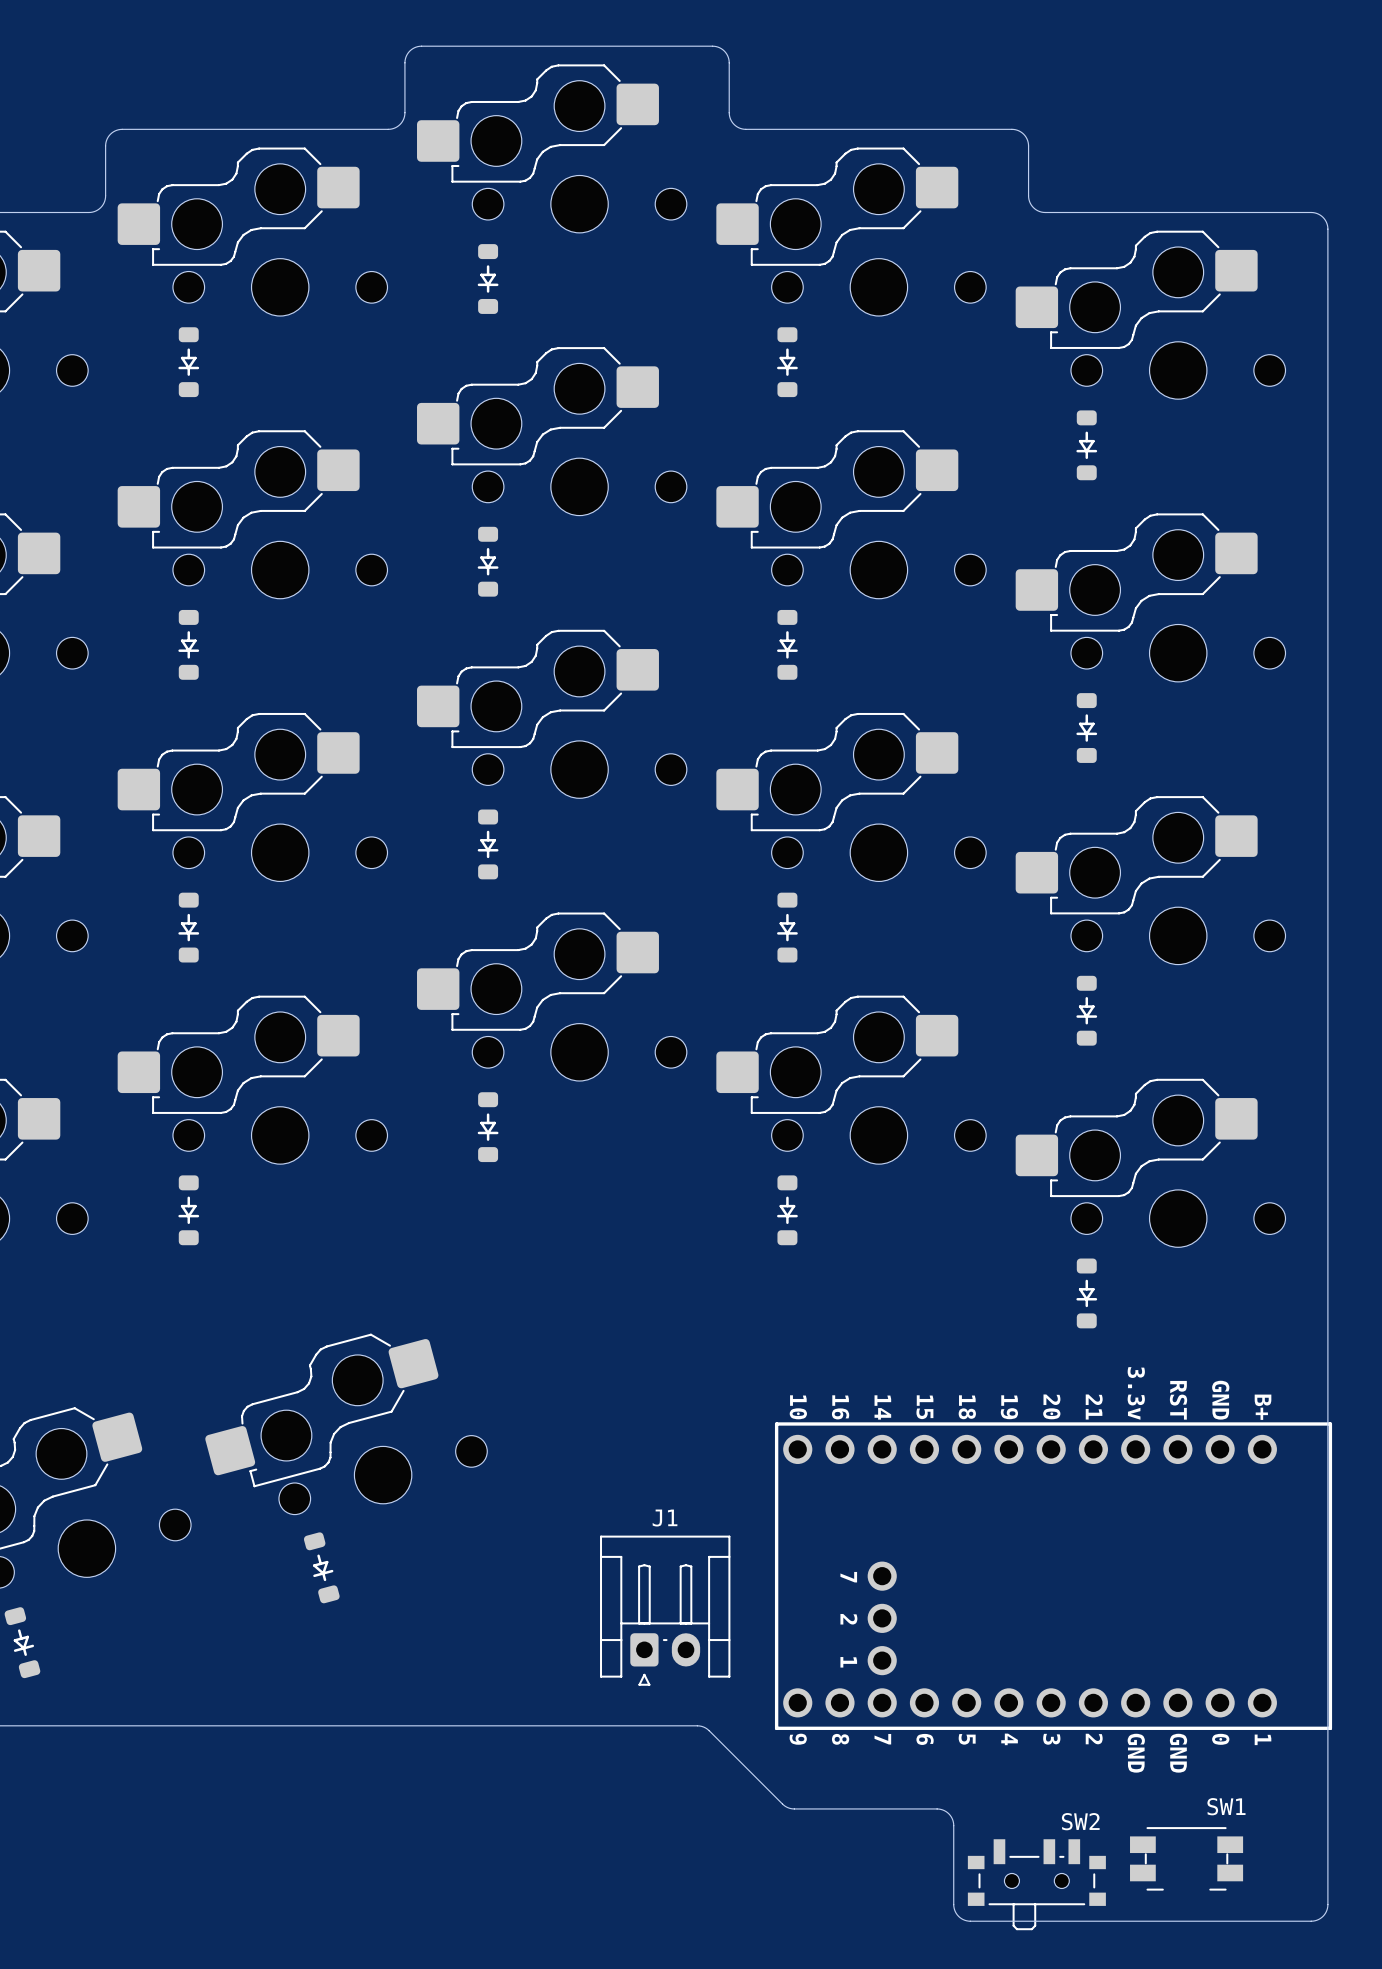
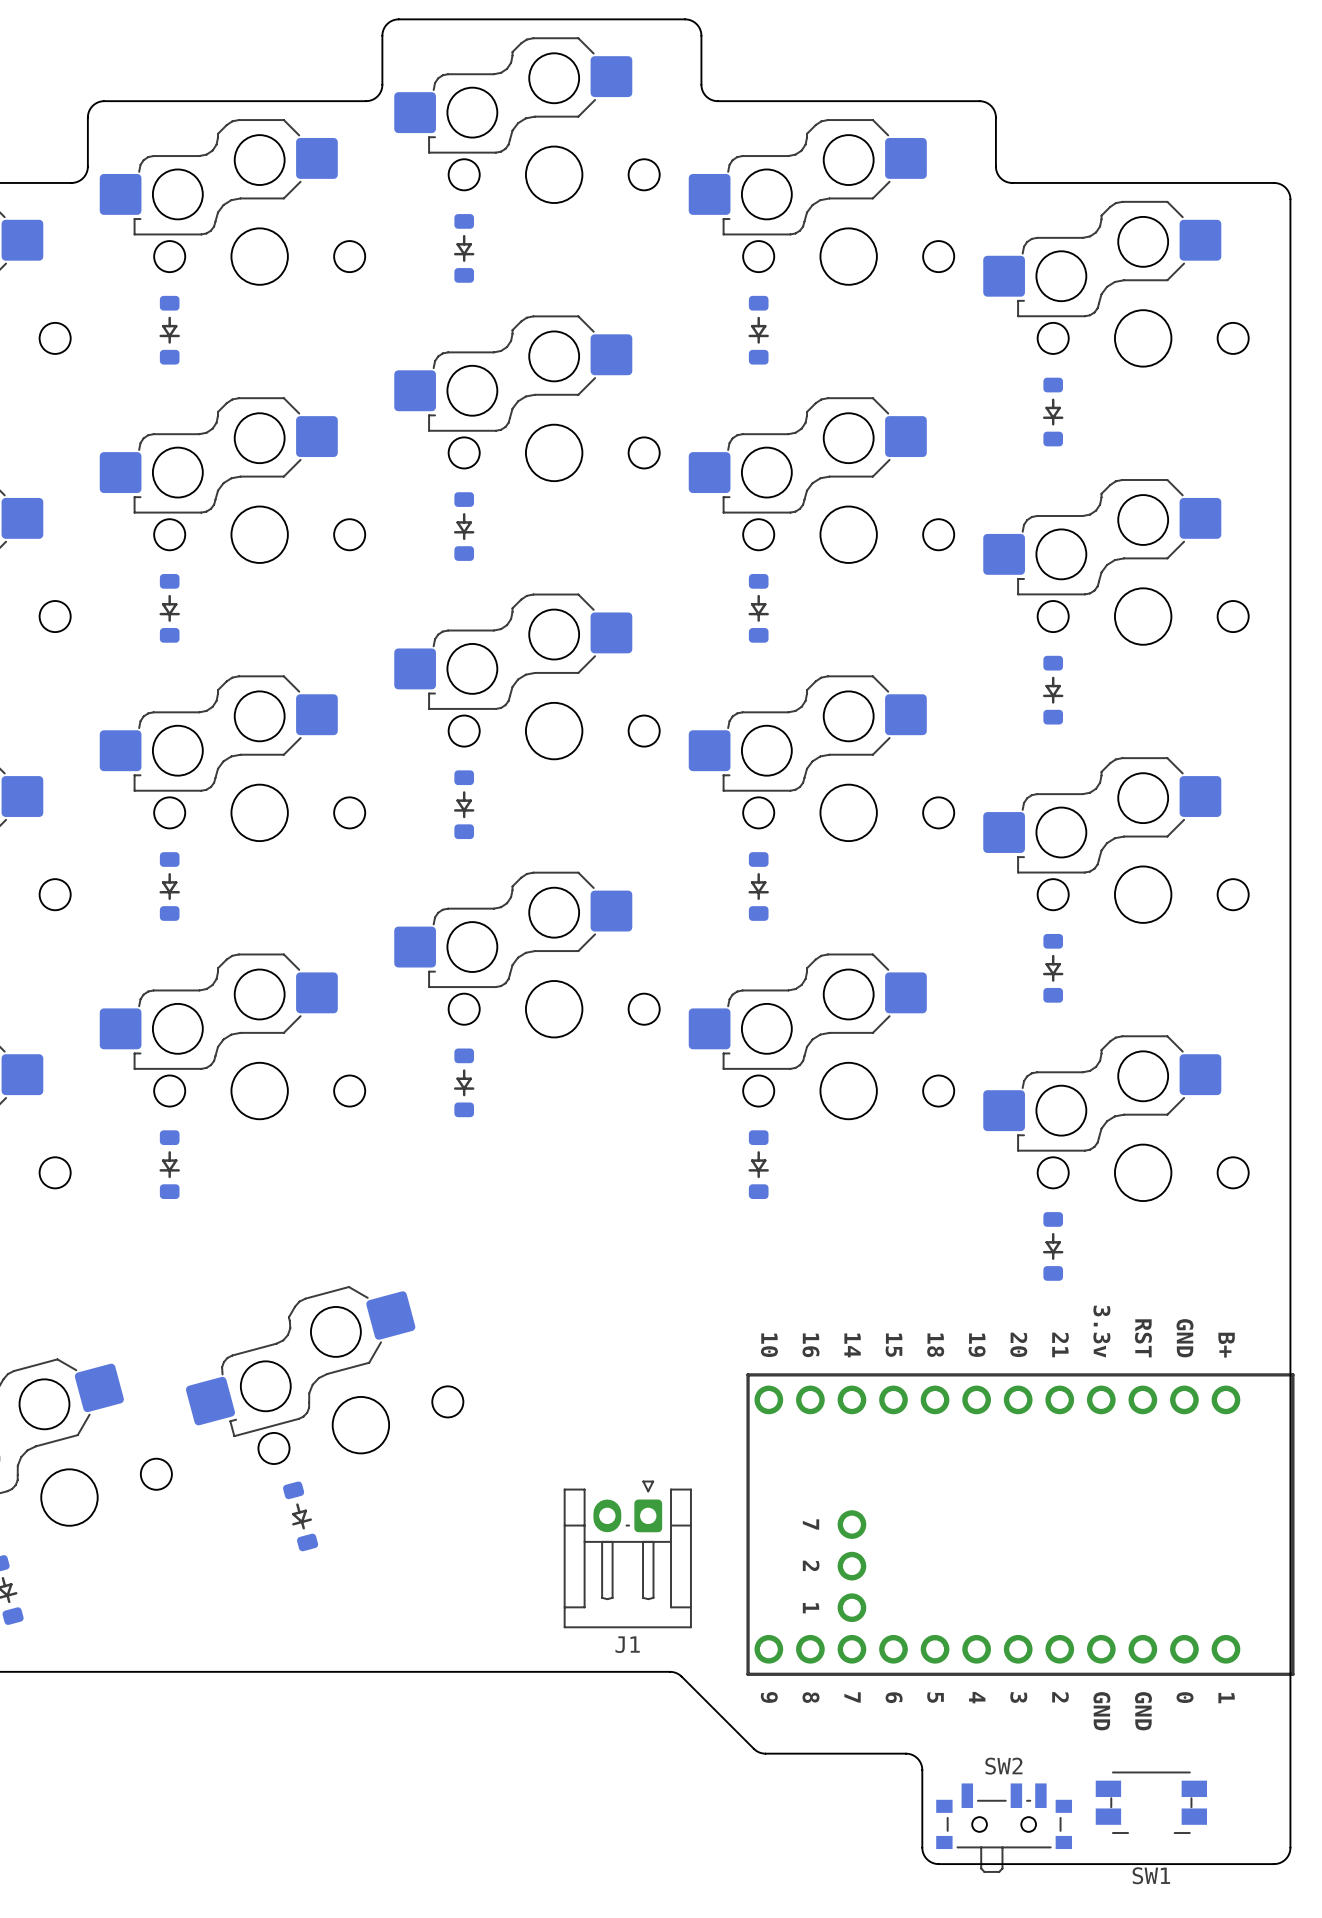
part footprint: [774, 1422, 1333, 1730] -> [746, 1373, 1295, 1676]
J1 rotation: 0° (665, 1610) -> 180° (627, 1554)
SW1 name position: SW1 (1226, 1806) -> SW1 (1151, 1875)
SW2 name position: SW2 (1080, 1821) -> SW2 (1003, 1766)

